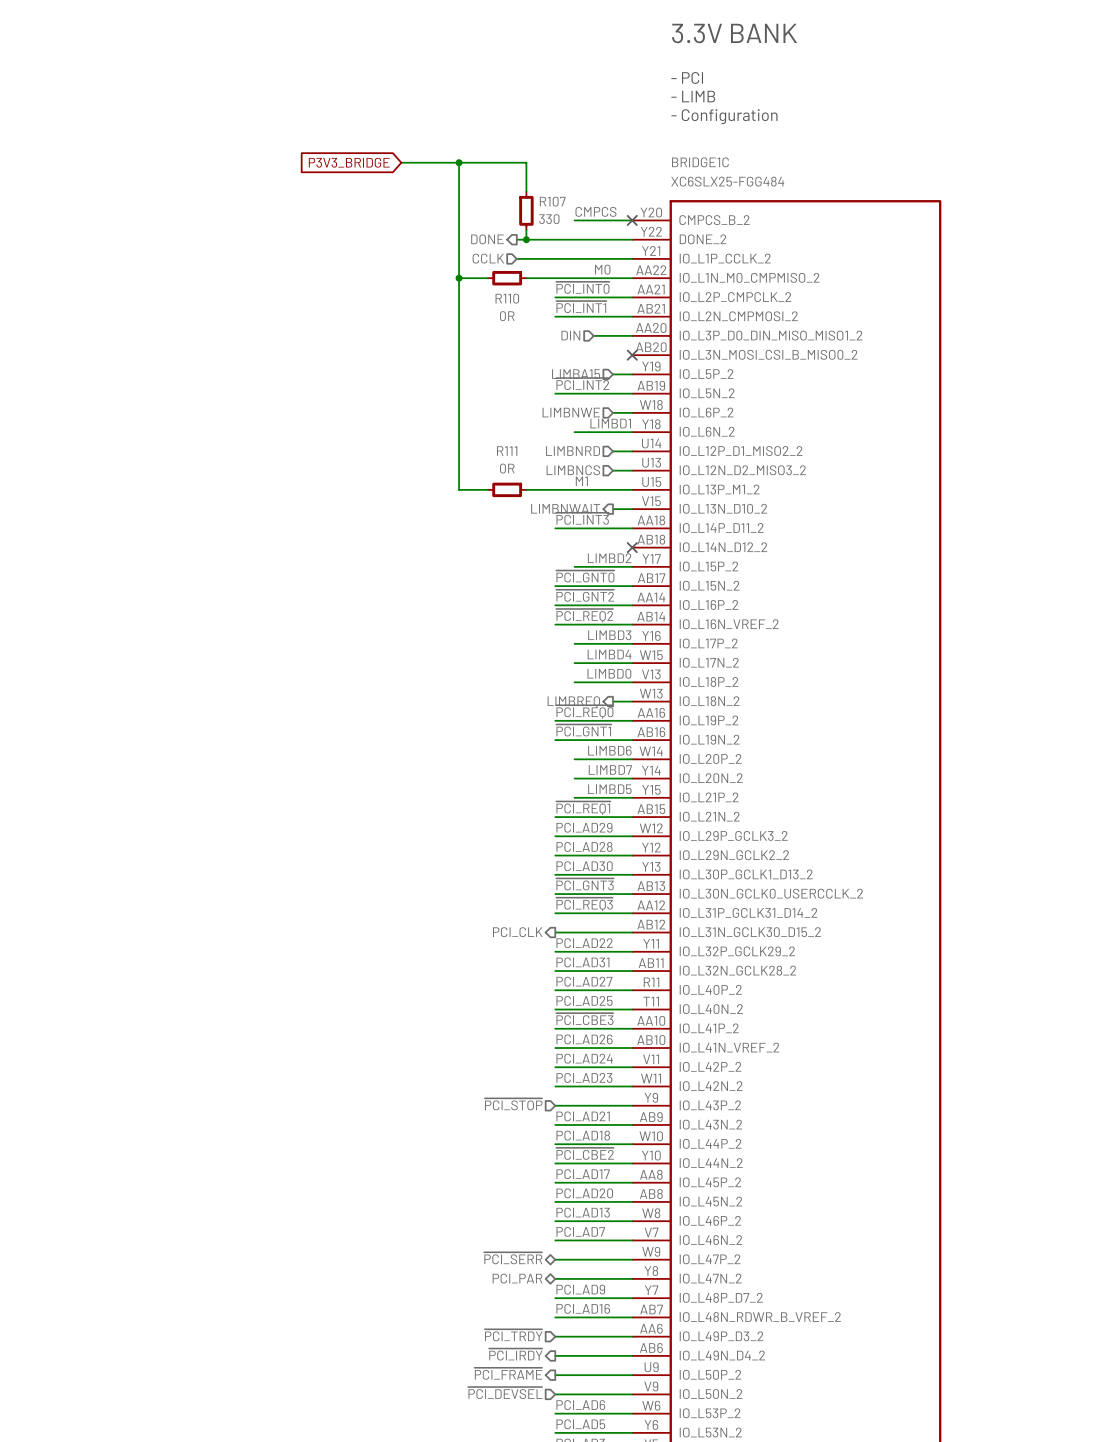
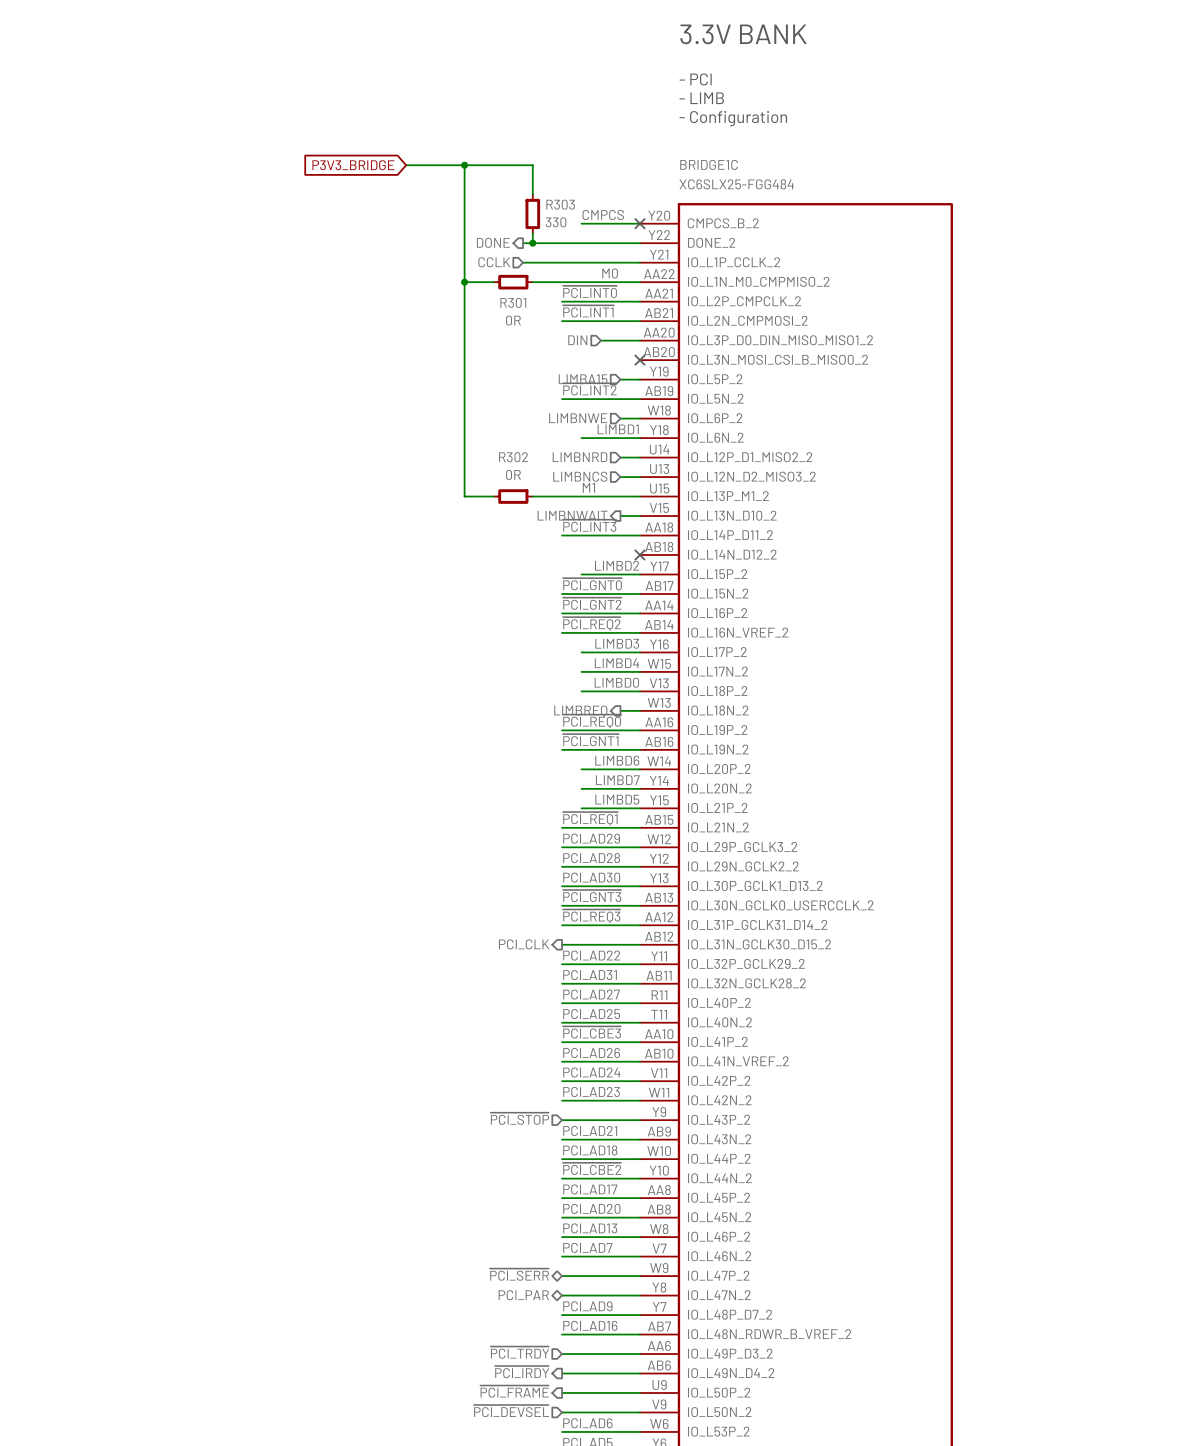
R107 name: R107 (552, 201) -> R303 (560, 204)
R110 name: R110 (507, 298) -> R301 (513, 302)
R111 name: R111 (507, 451) -> R302 (513, 457)

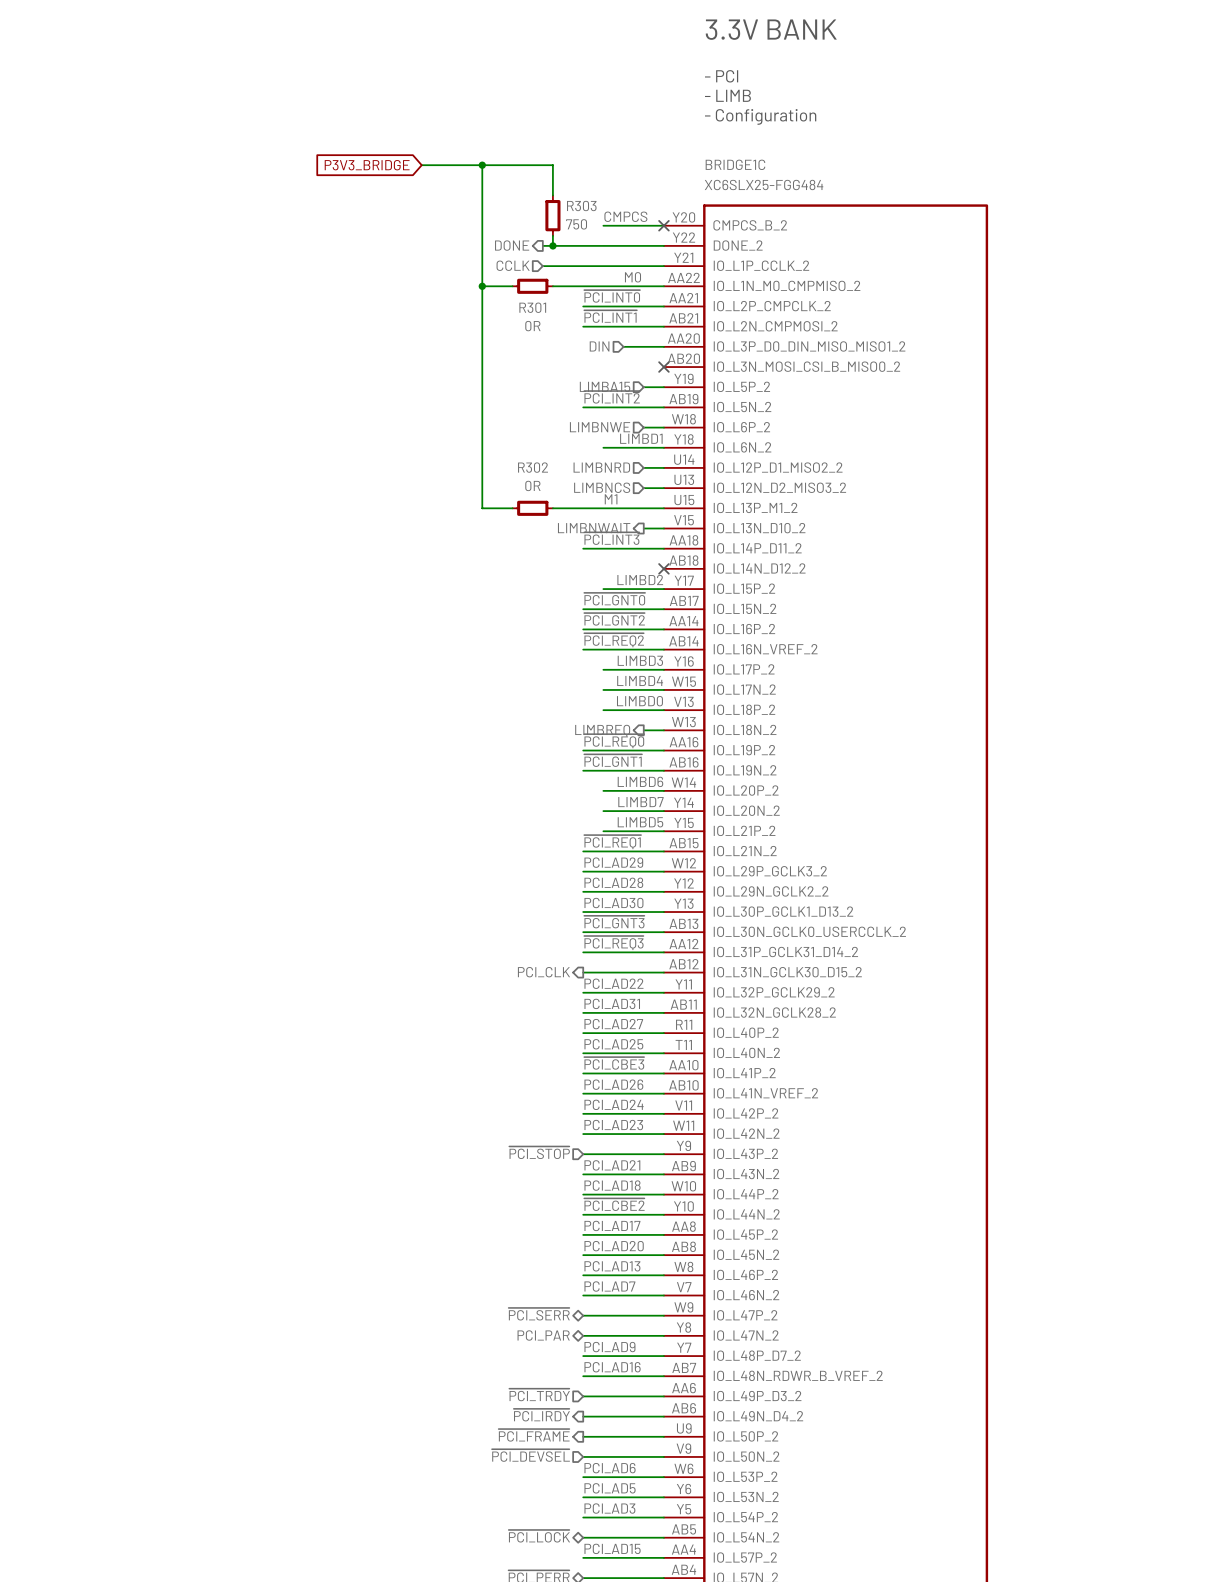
R303 value: 330 (556, 222) -> 750 (576, 224)

